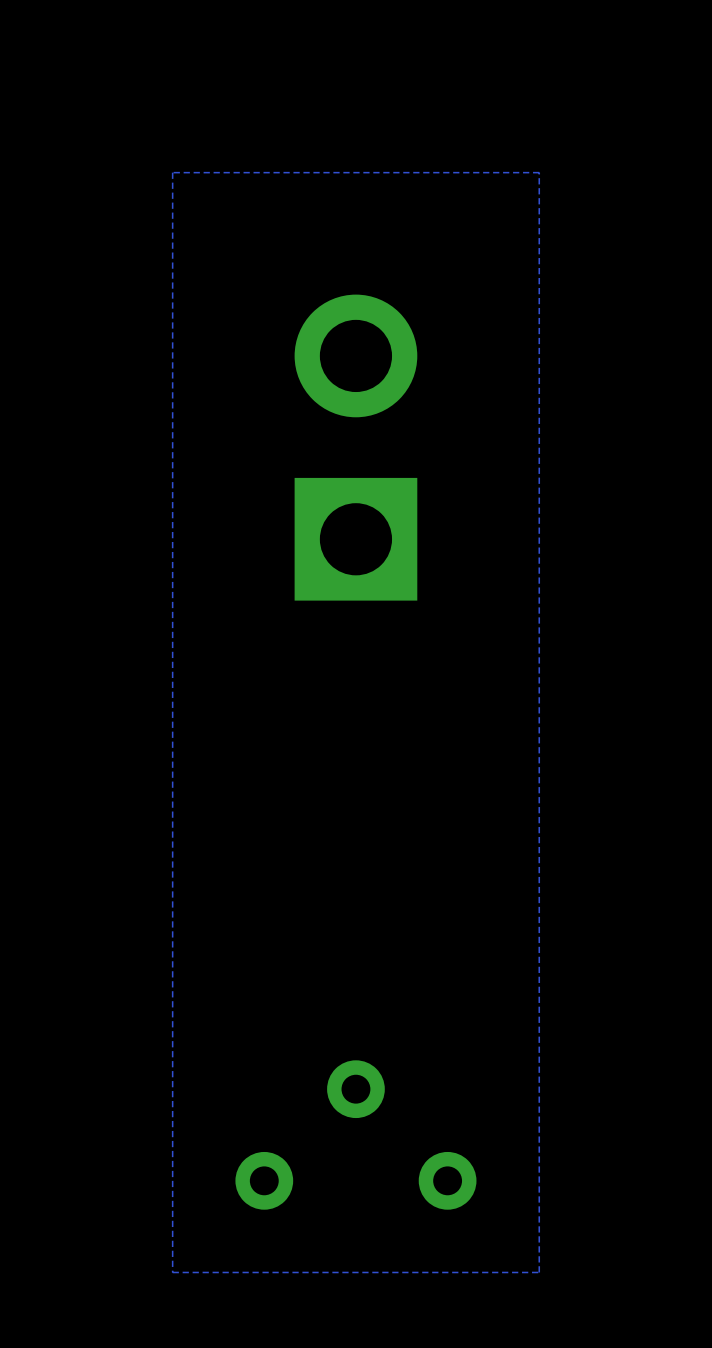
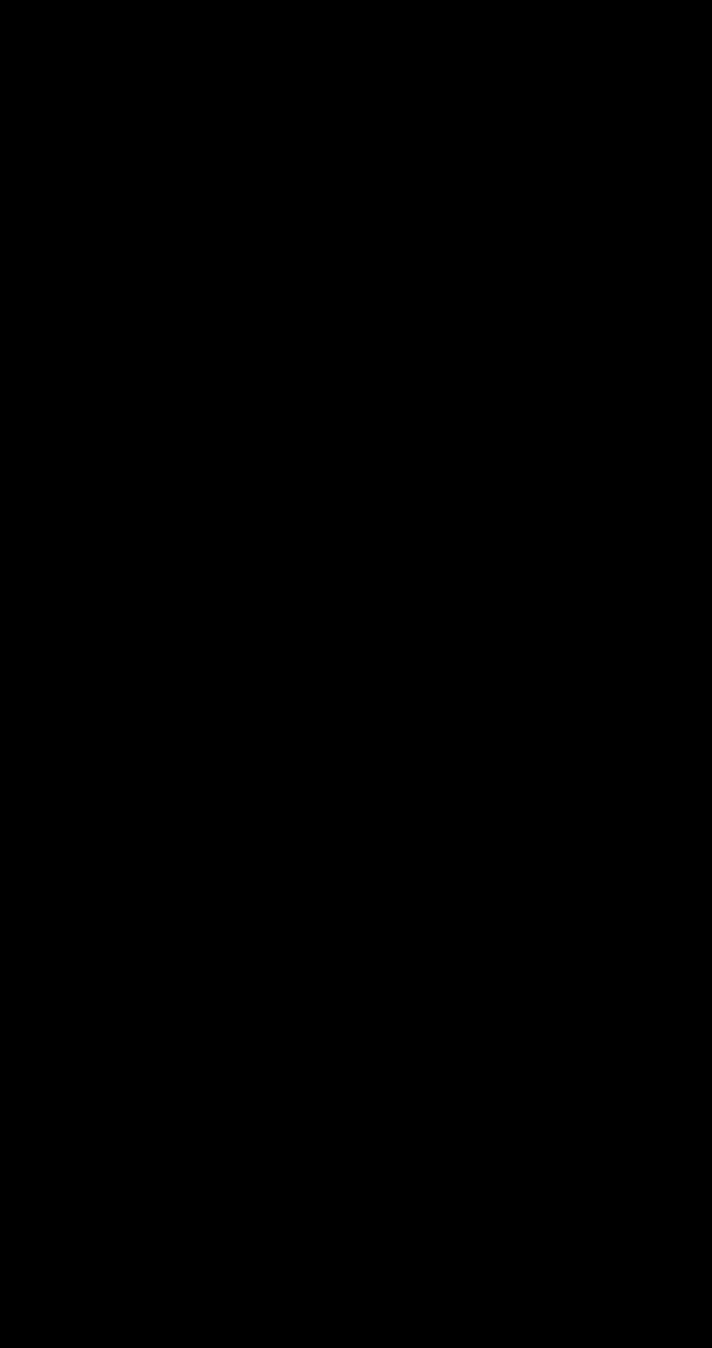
zone outline: (539, 172) (539, 1272) (172, 1272) (172, 172) (539, 172) -> none
part: (355, 447) -> none
via: (355, 1089) -> none
via: (264, 1180) -> none
via: (447, 1180) -> none

